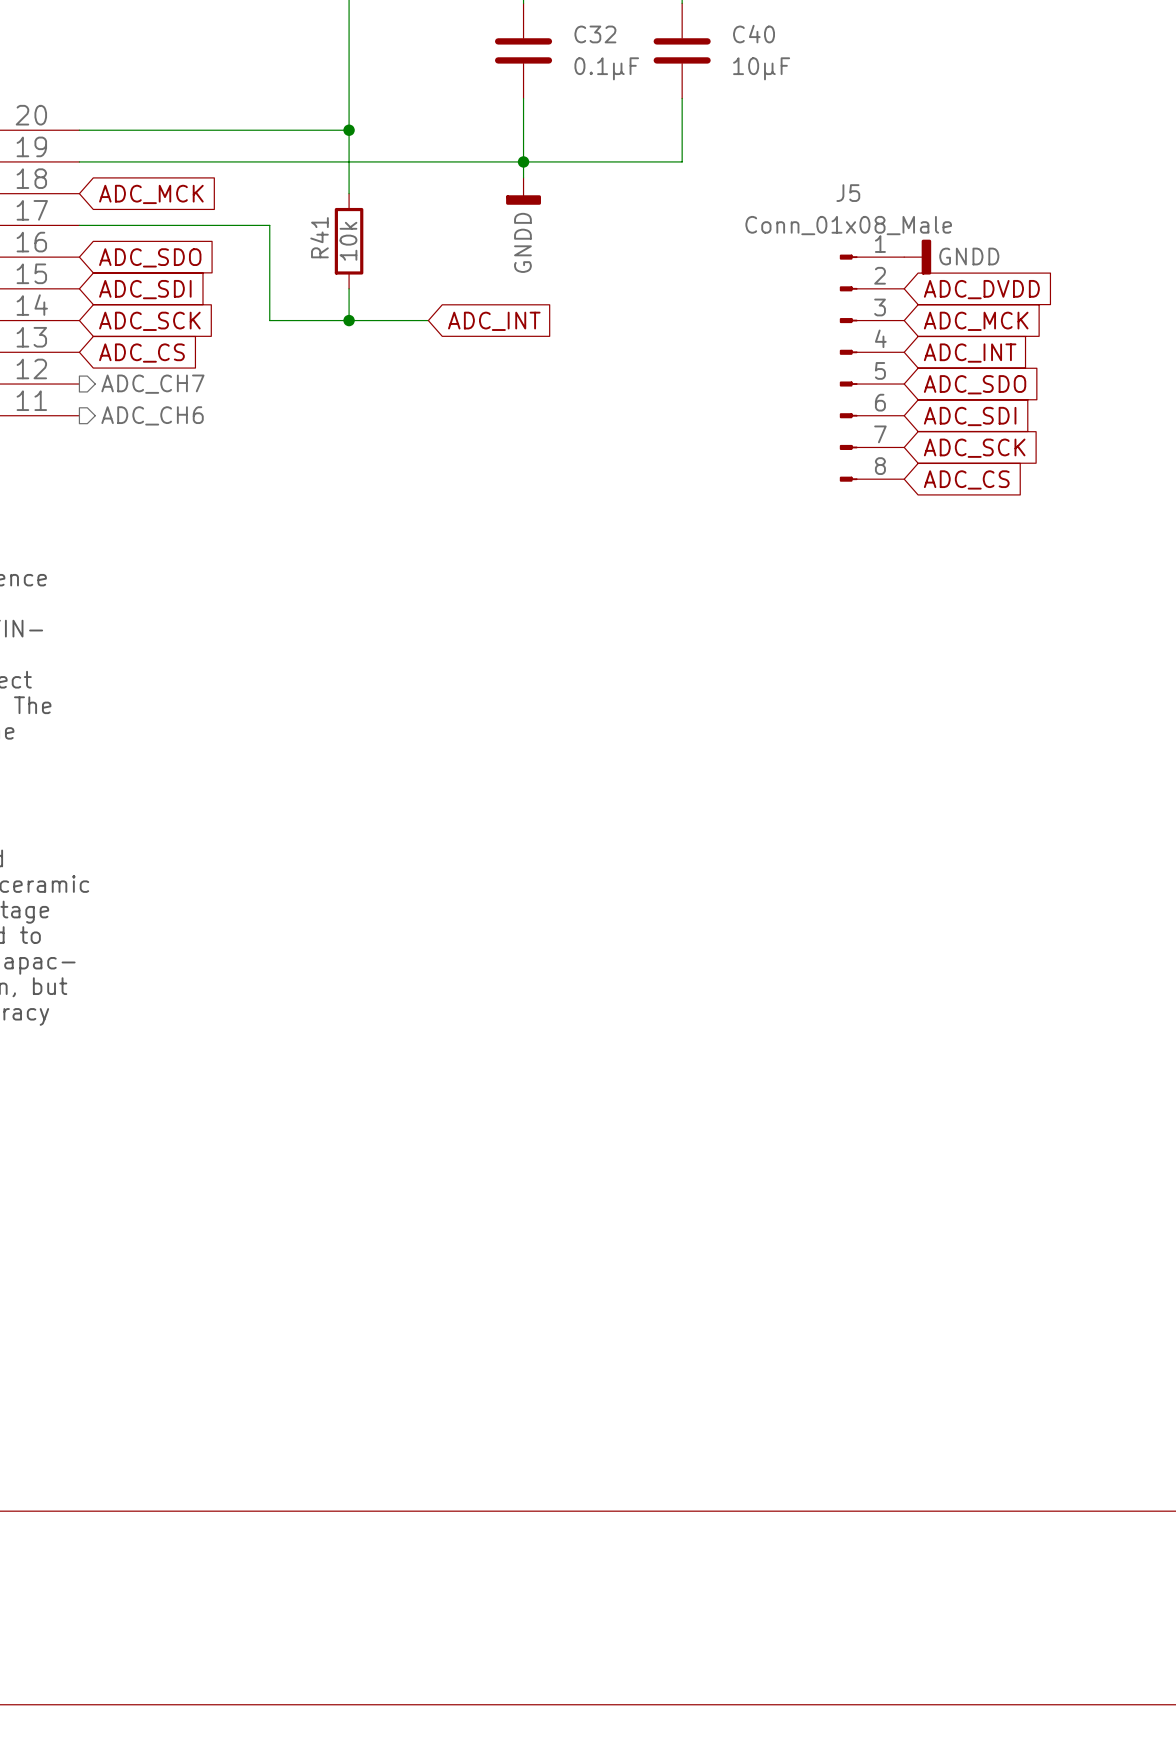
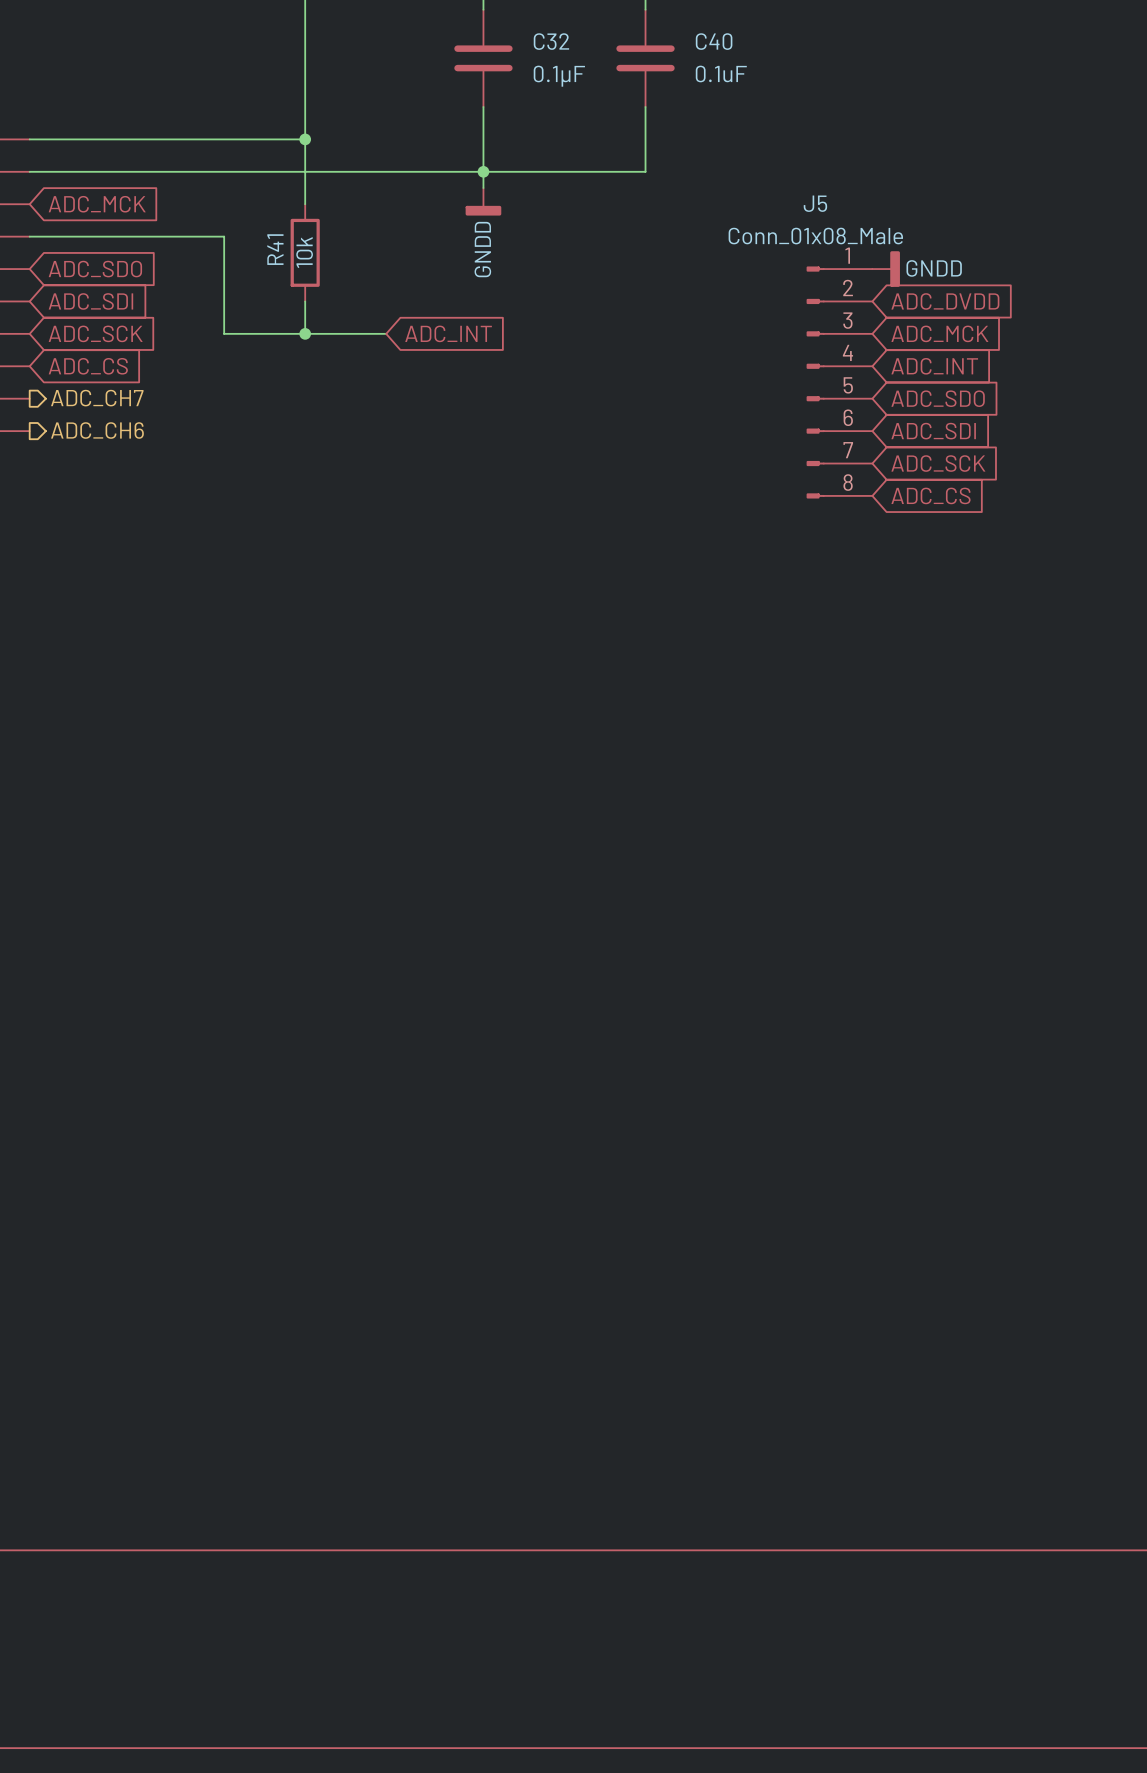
C40 value: 10µF (761, 68) -> 0.1uF (721, 73)

